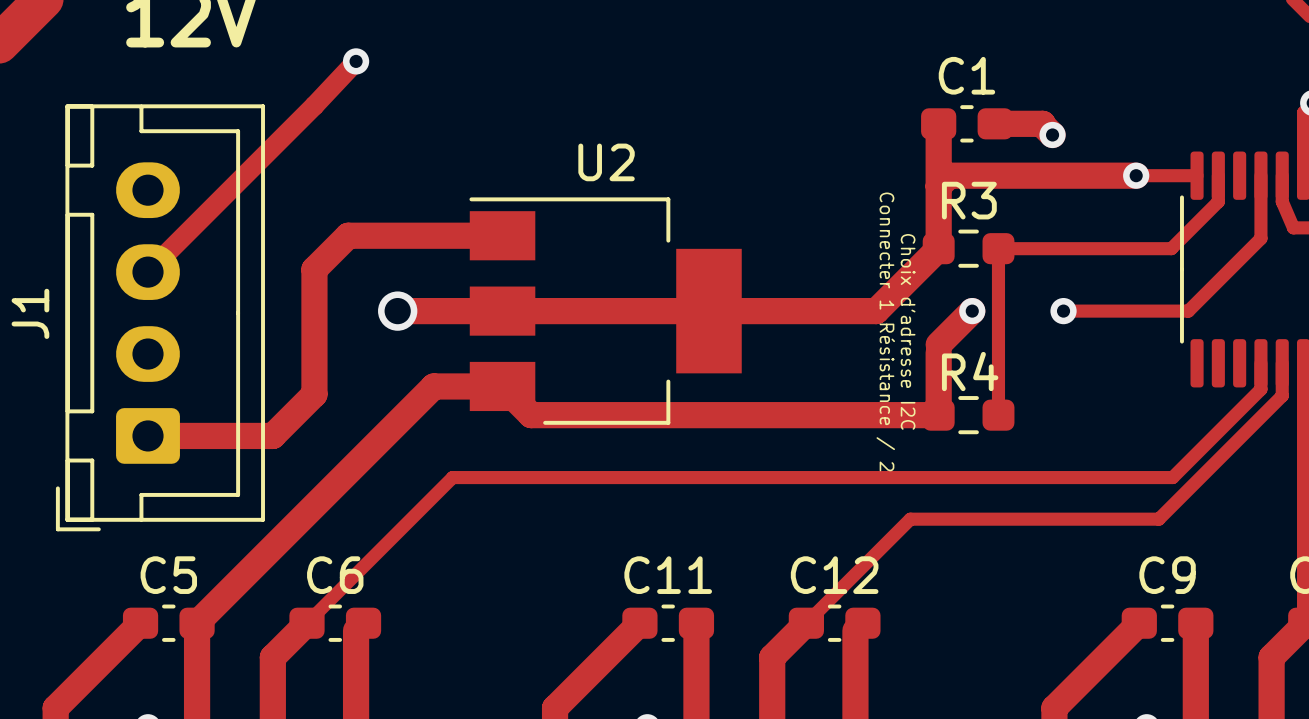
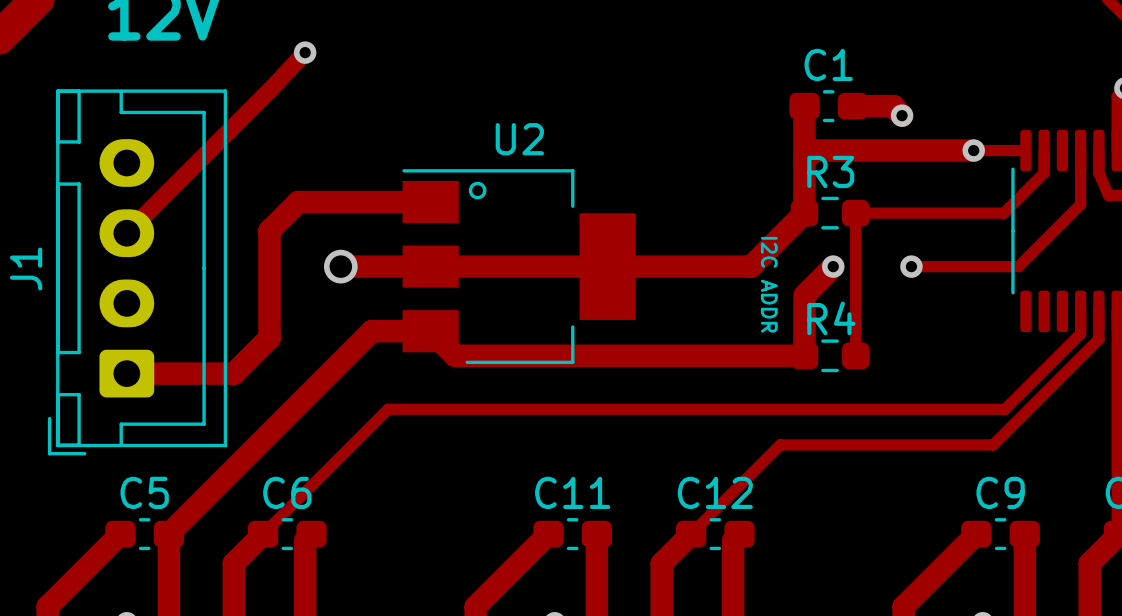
drawing: none -> [468, 181, 487, 200]
text: Connecter 1 Résistance / 2 (885, 331) -> none
text: Choix d'adresse I2C (908, 331) -> none
text: none -> I2C ADDR (769, 284)

